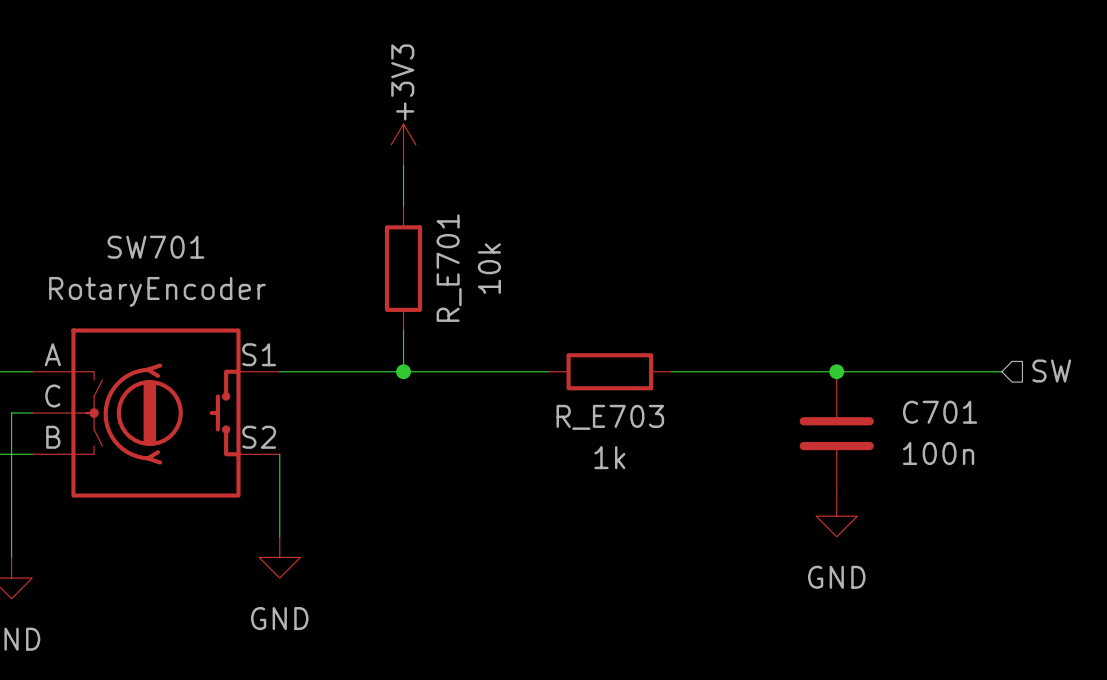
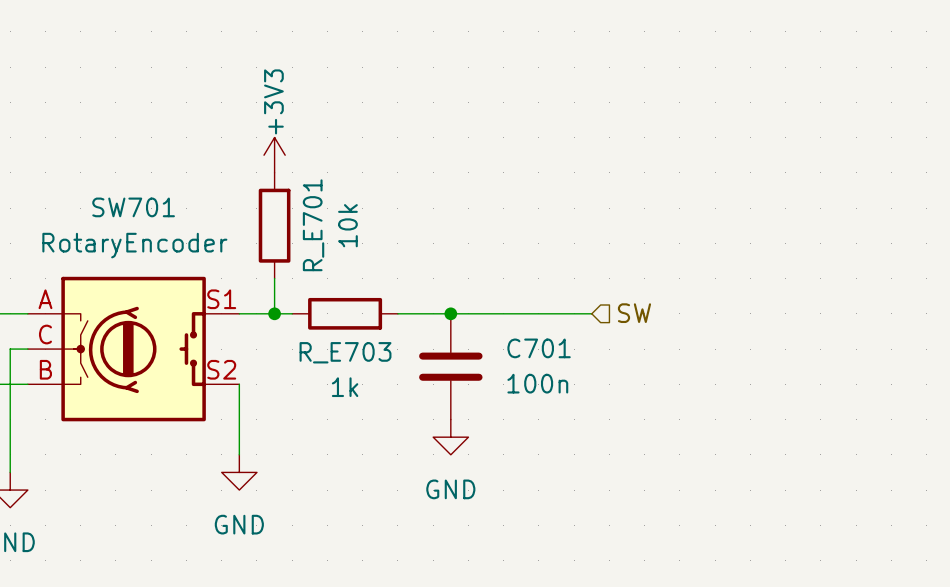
power symbol position: +3V3 (403, 144) -> +3V3 (274, 155)
wire: (403, 165) (403, 206) -> none
R_E701 position: (403, 268) -> (274, 225)
wire: (403, 330) (403, 371) -> (274, 278) (274, 313)
hierarchical label position: SW (1051, 370) -> SW (634, 313)
junction: none -> (274, 313)
wire: (341, 371) (465, 371) -> (468, 313) (574, 313)
junction: (403, 371) -> none
junction: none -> (450, 313)
R_E703 position: (609, 371) -> (345, 313)
wire: (692, 371) (1001, 371) -> none
junction: (836, 371) -> none
C701 position: (836, 433) -> (450, 366)
power symbol position: GND (836, 516) -> GND (450, 437)

